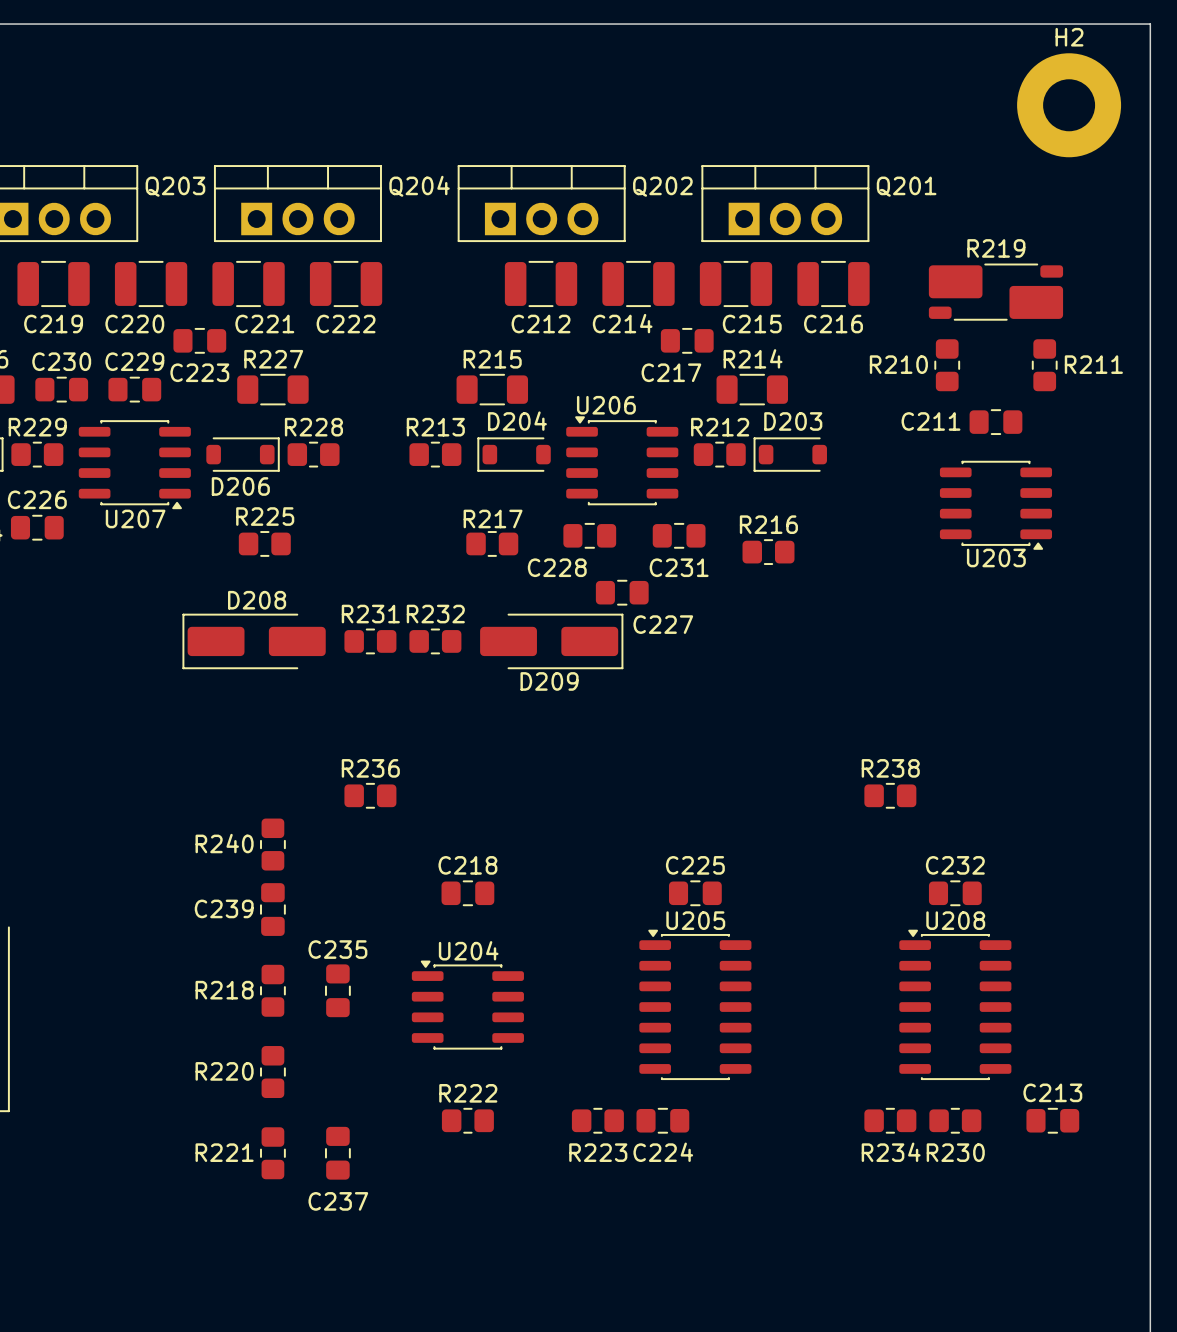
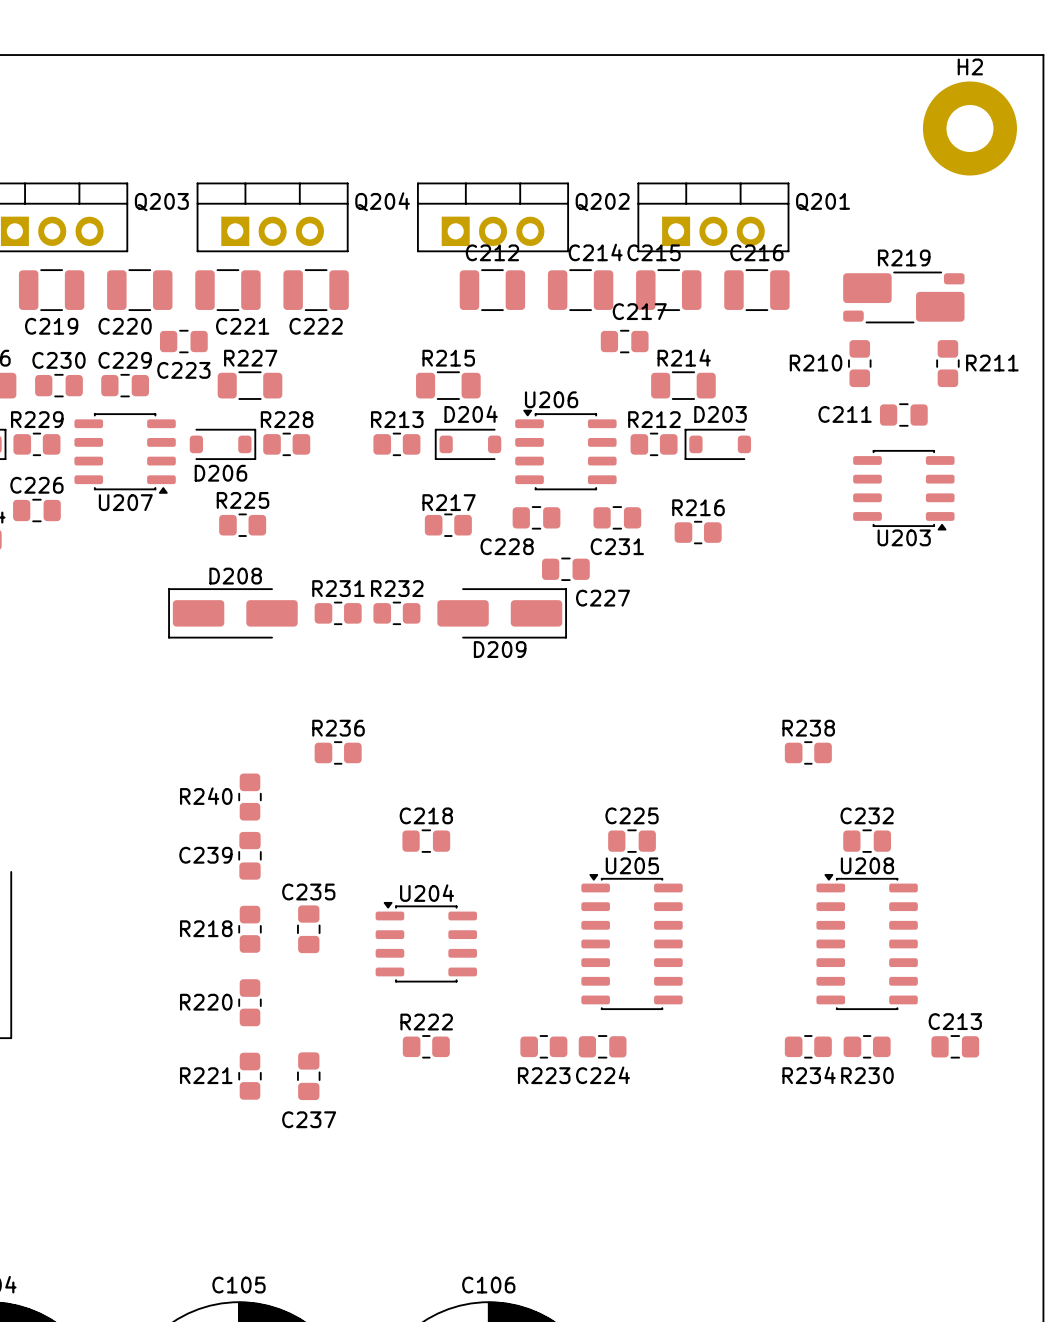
C214 name position: C214 (622, 323) -> C214 (595, 252)
C212 name position: C212 (541, 324) -> C212 (492, 252)
C215 name position: C215 (752, 324) -> C215 (654, 252)
C216 name position: C216 (833, 324) -> C216 (756, 252)
C217 name position: C217 (671, 372) -> C217 (639, 311)

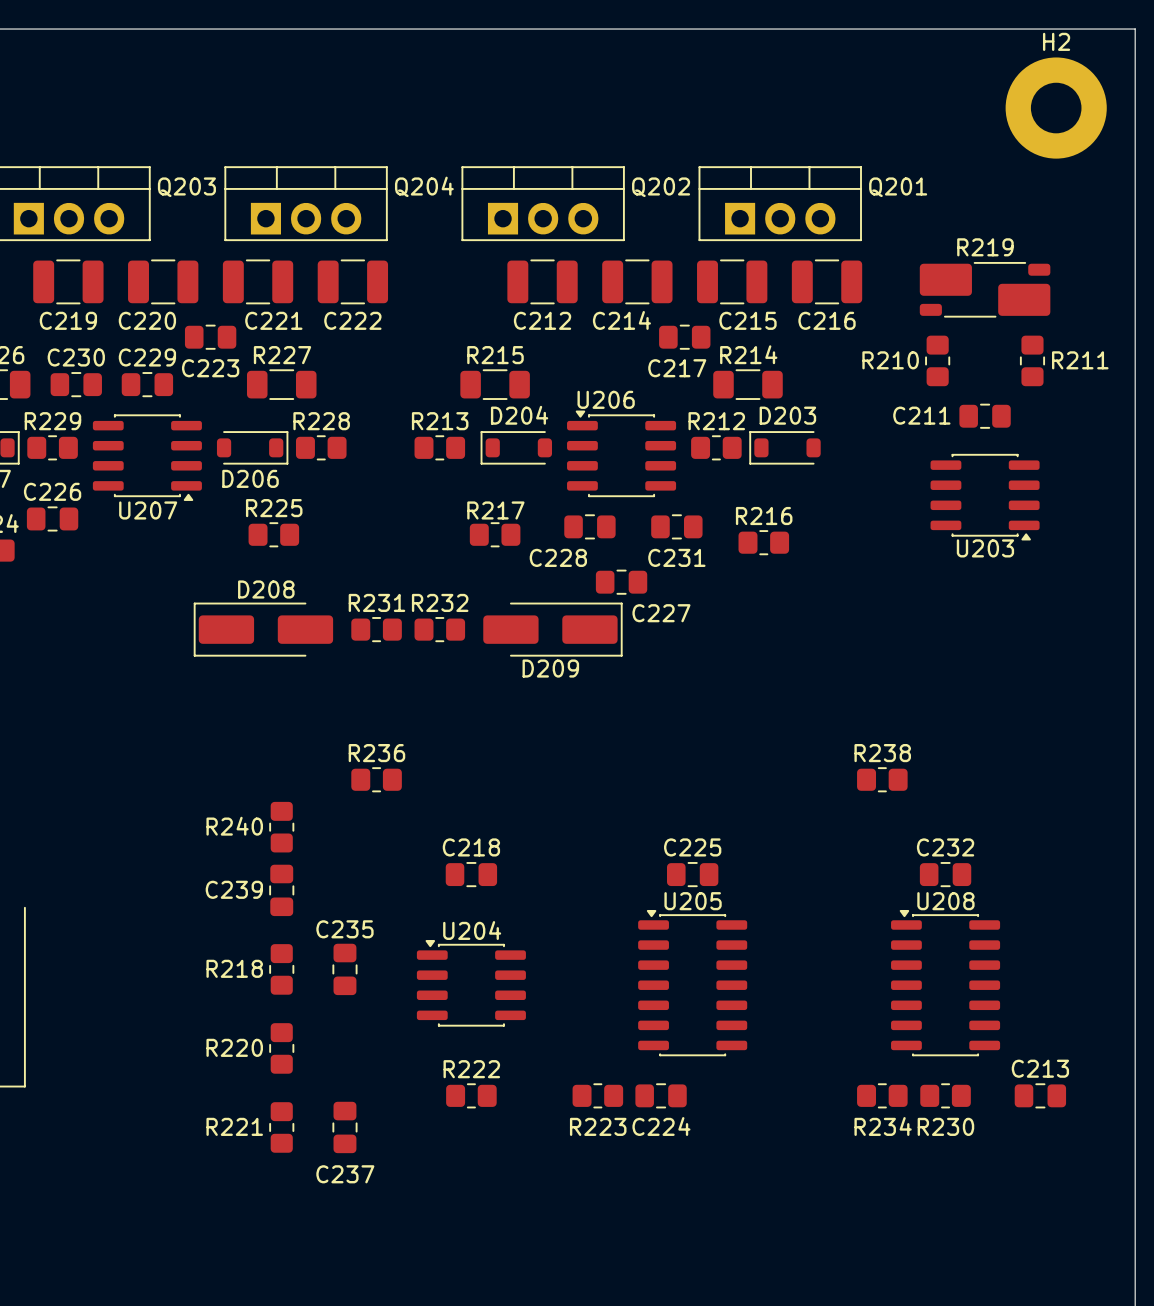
C212 name position: C212 (492, 252) -> C212 (542, 320)
C214 name position: C214 (595, 252) -> C214 (621, 320)
C215 name position: C215 (654, 252) -> C215 (747, 320)
C216 name position: C216 (756, 252) -> C216 (827, 320)
C217 name position: C217 (639, 311) -> C217 (677, 368)

